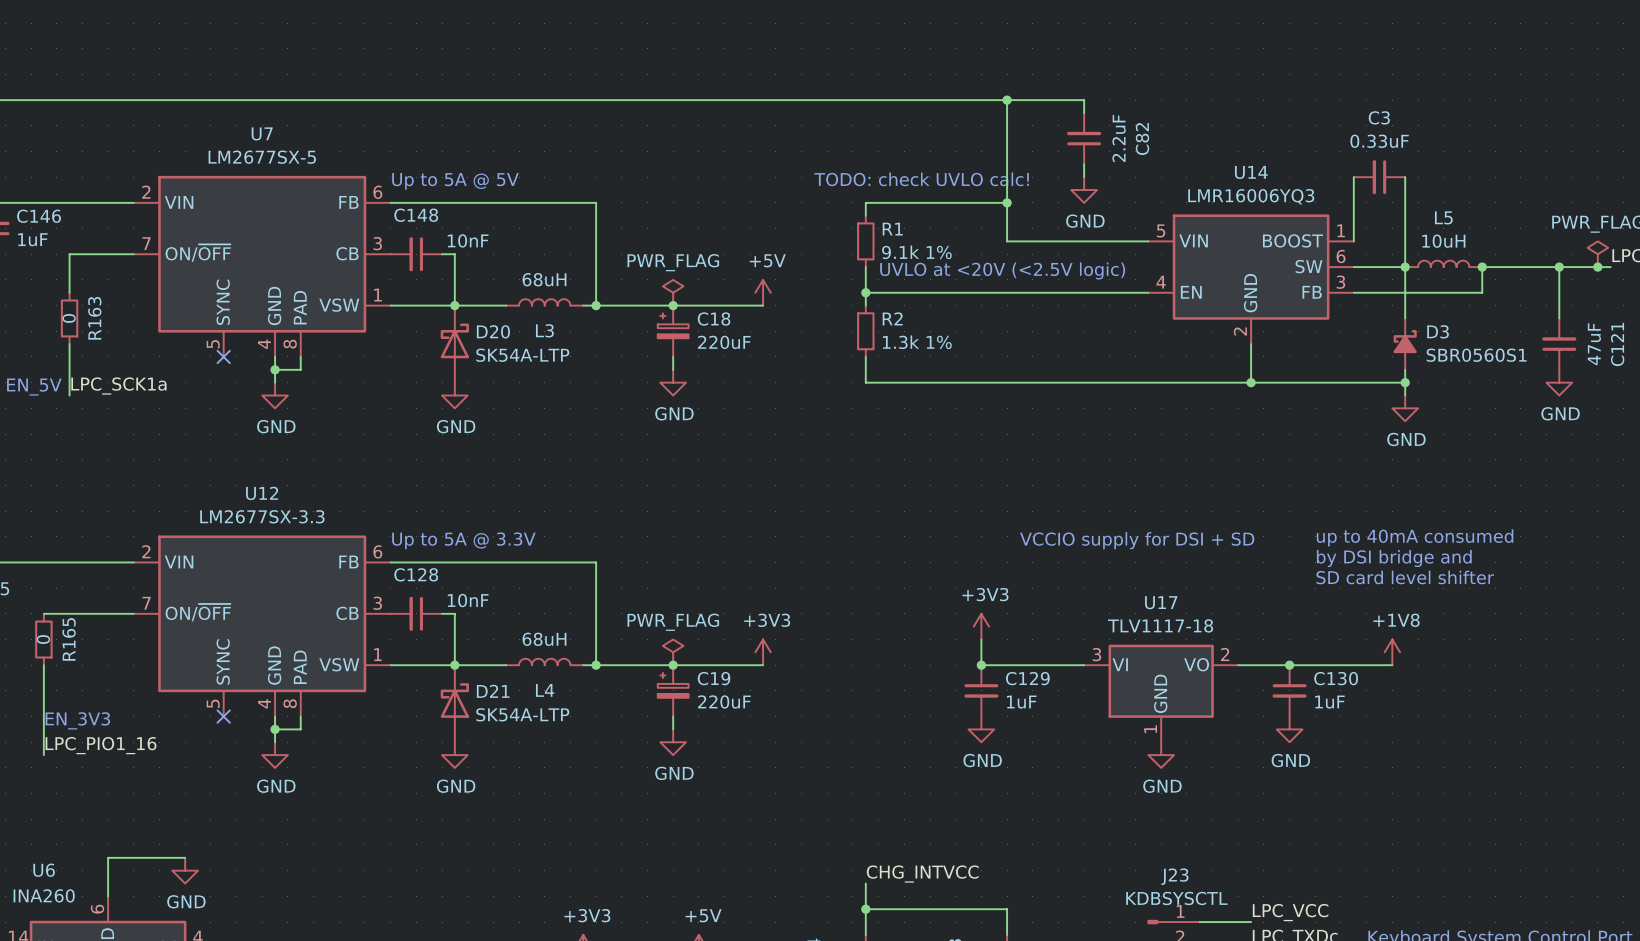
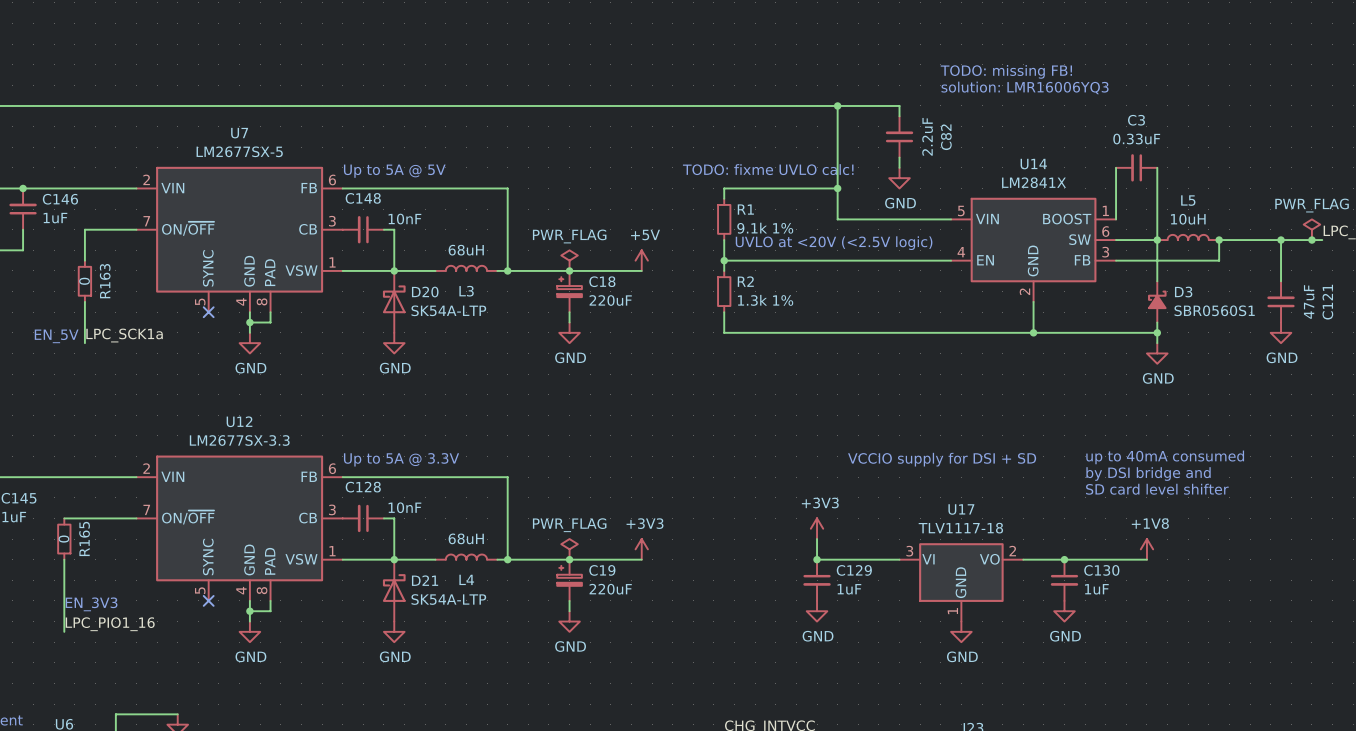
text: none -> TODO: missing FB! (1006, 71)
text: none -> solution: LMR16006YQ3 (1025, 87)
text: TODO: check UVLO calc! (921, 179) -> TODO: fixme UVLO calc! (768, 169)
U14 value: LMR16006YQ3 (1251, 196) -> LM2841X (1034, 182)

